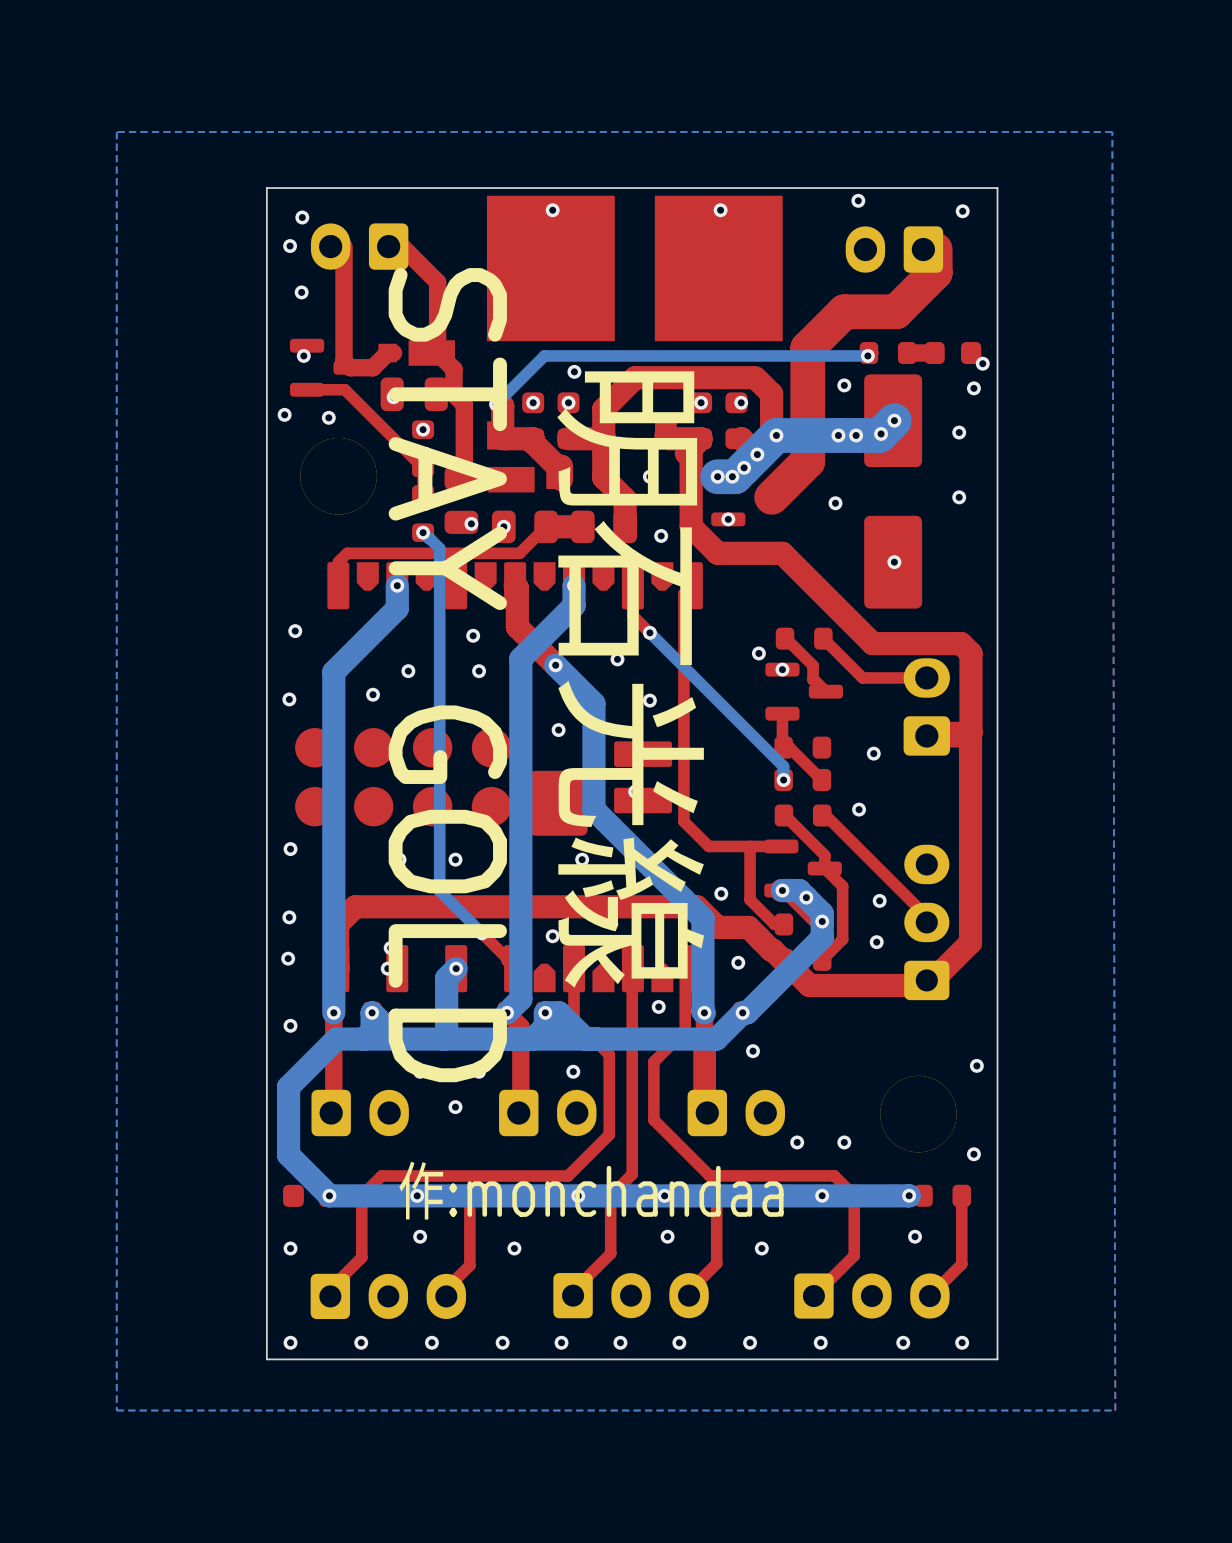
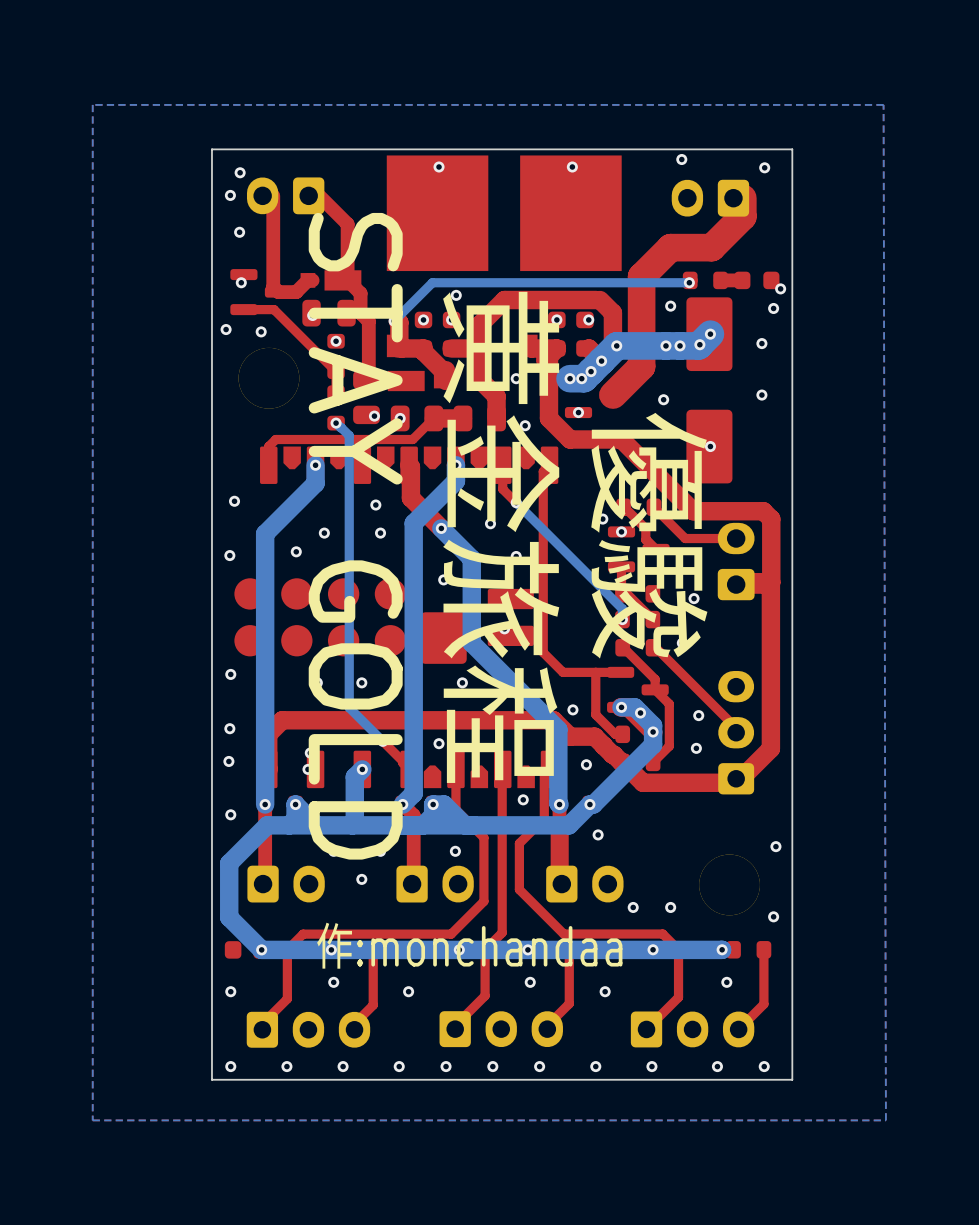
text: none -> 優駿 (649, 535)
text: 明石光線 (630, 679) -> 黄金旅程 (501, 537)

